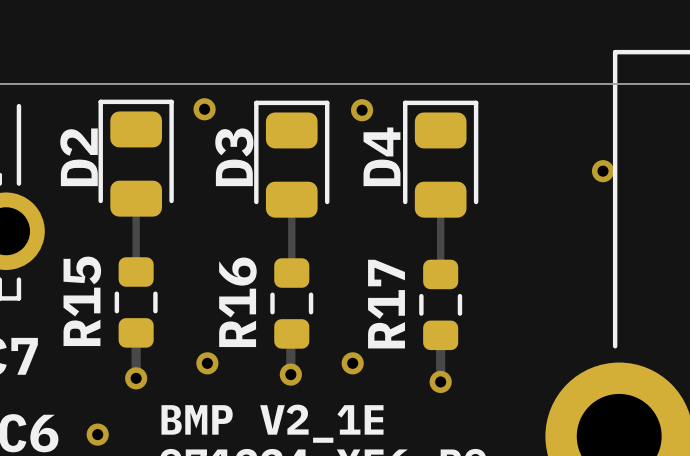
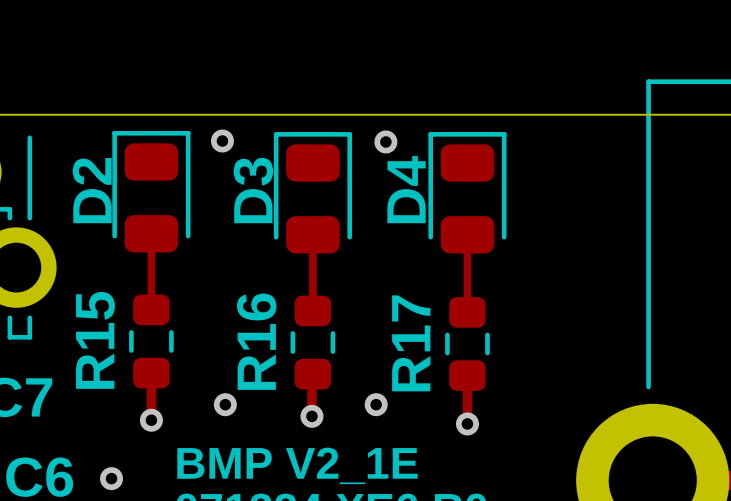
via: (603, 171) -> none

